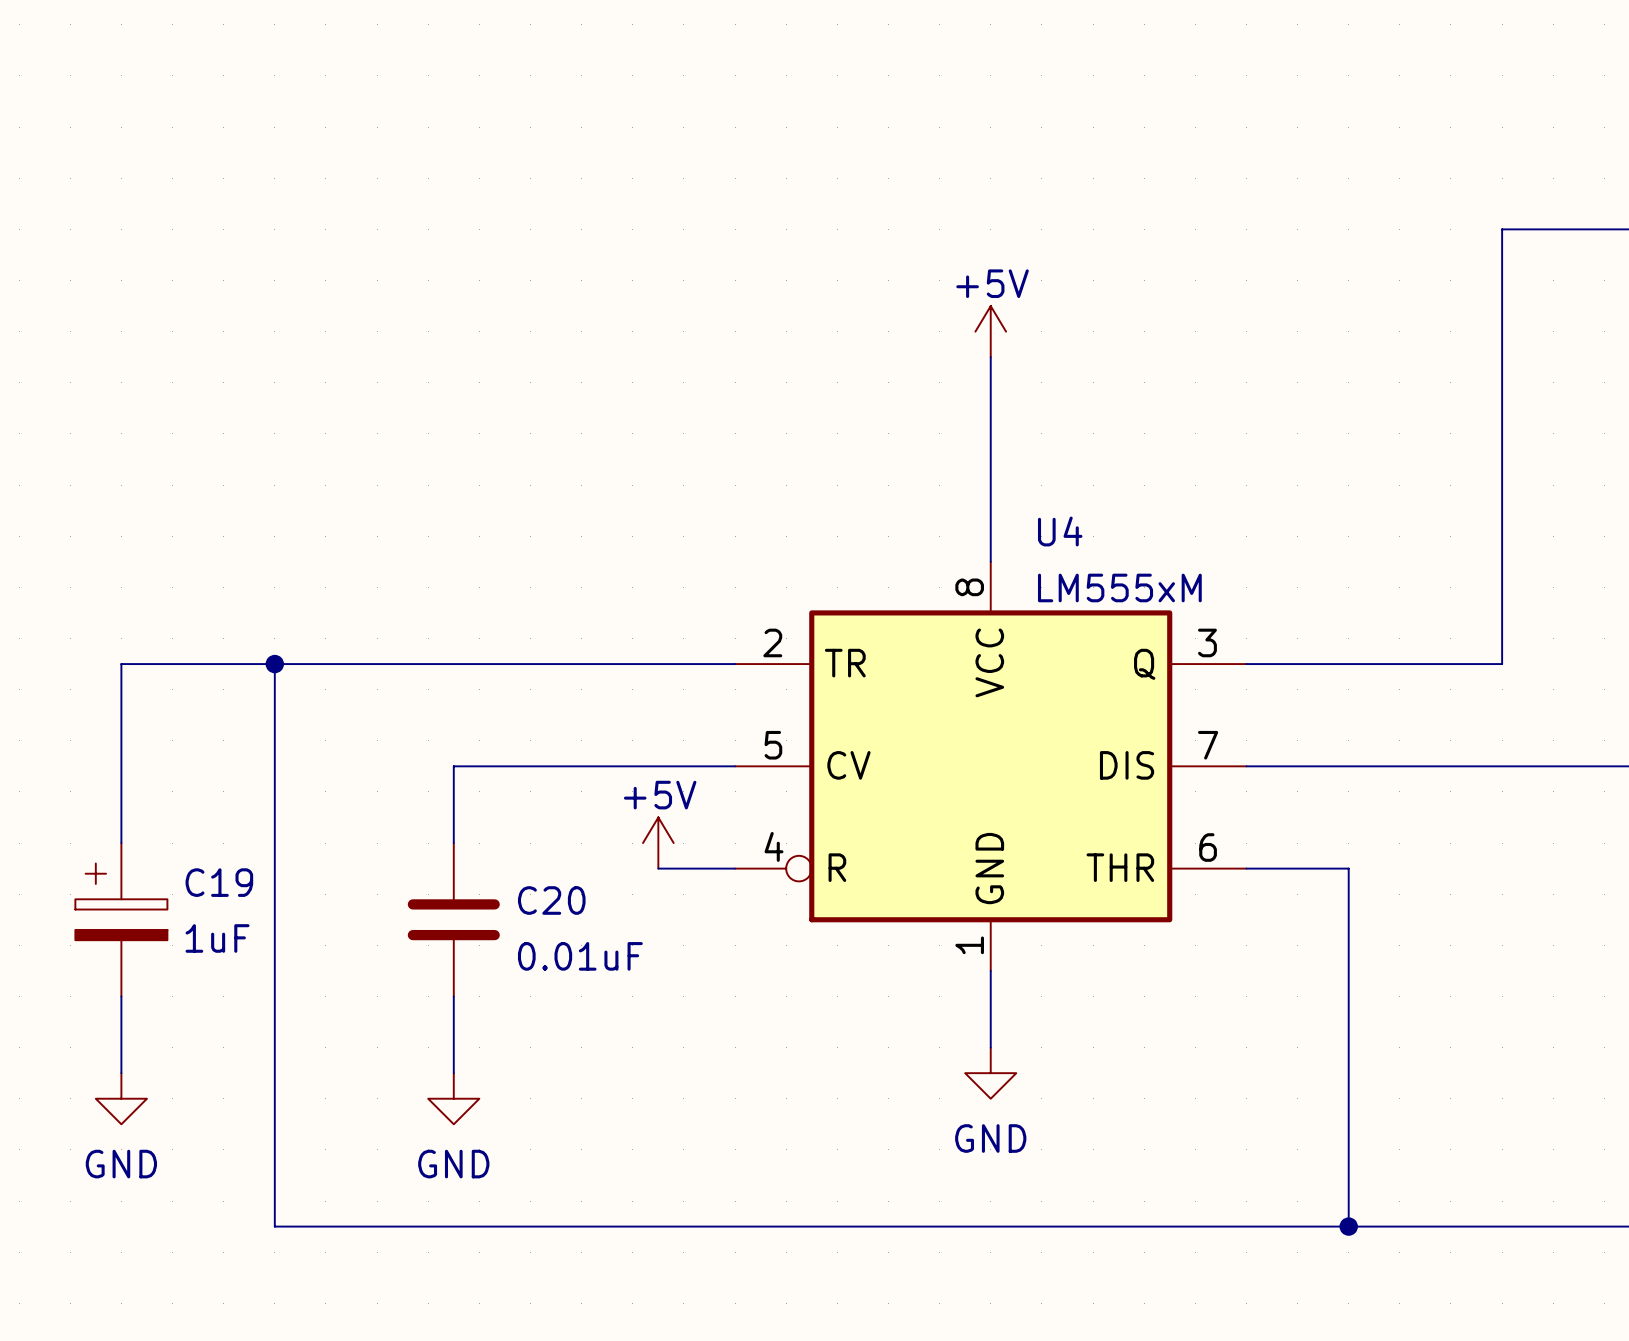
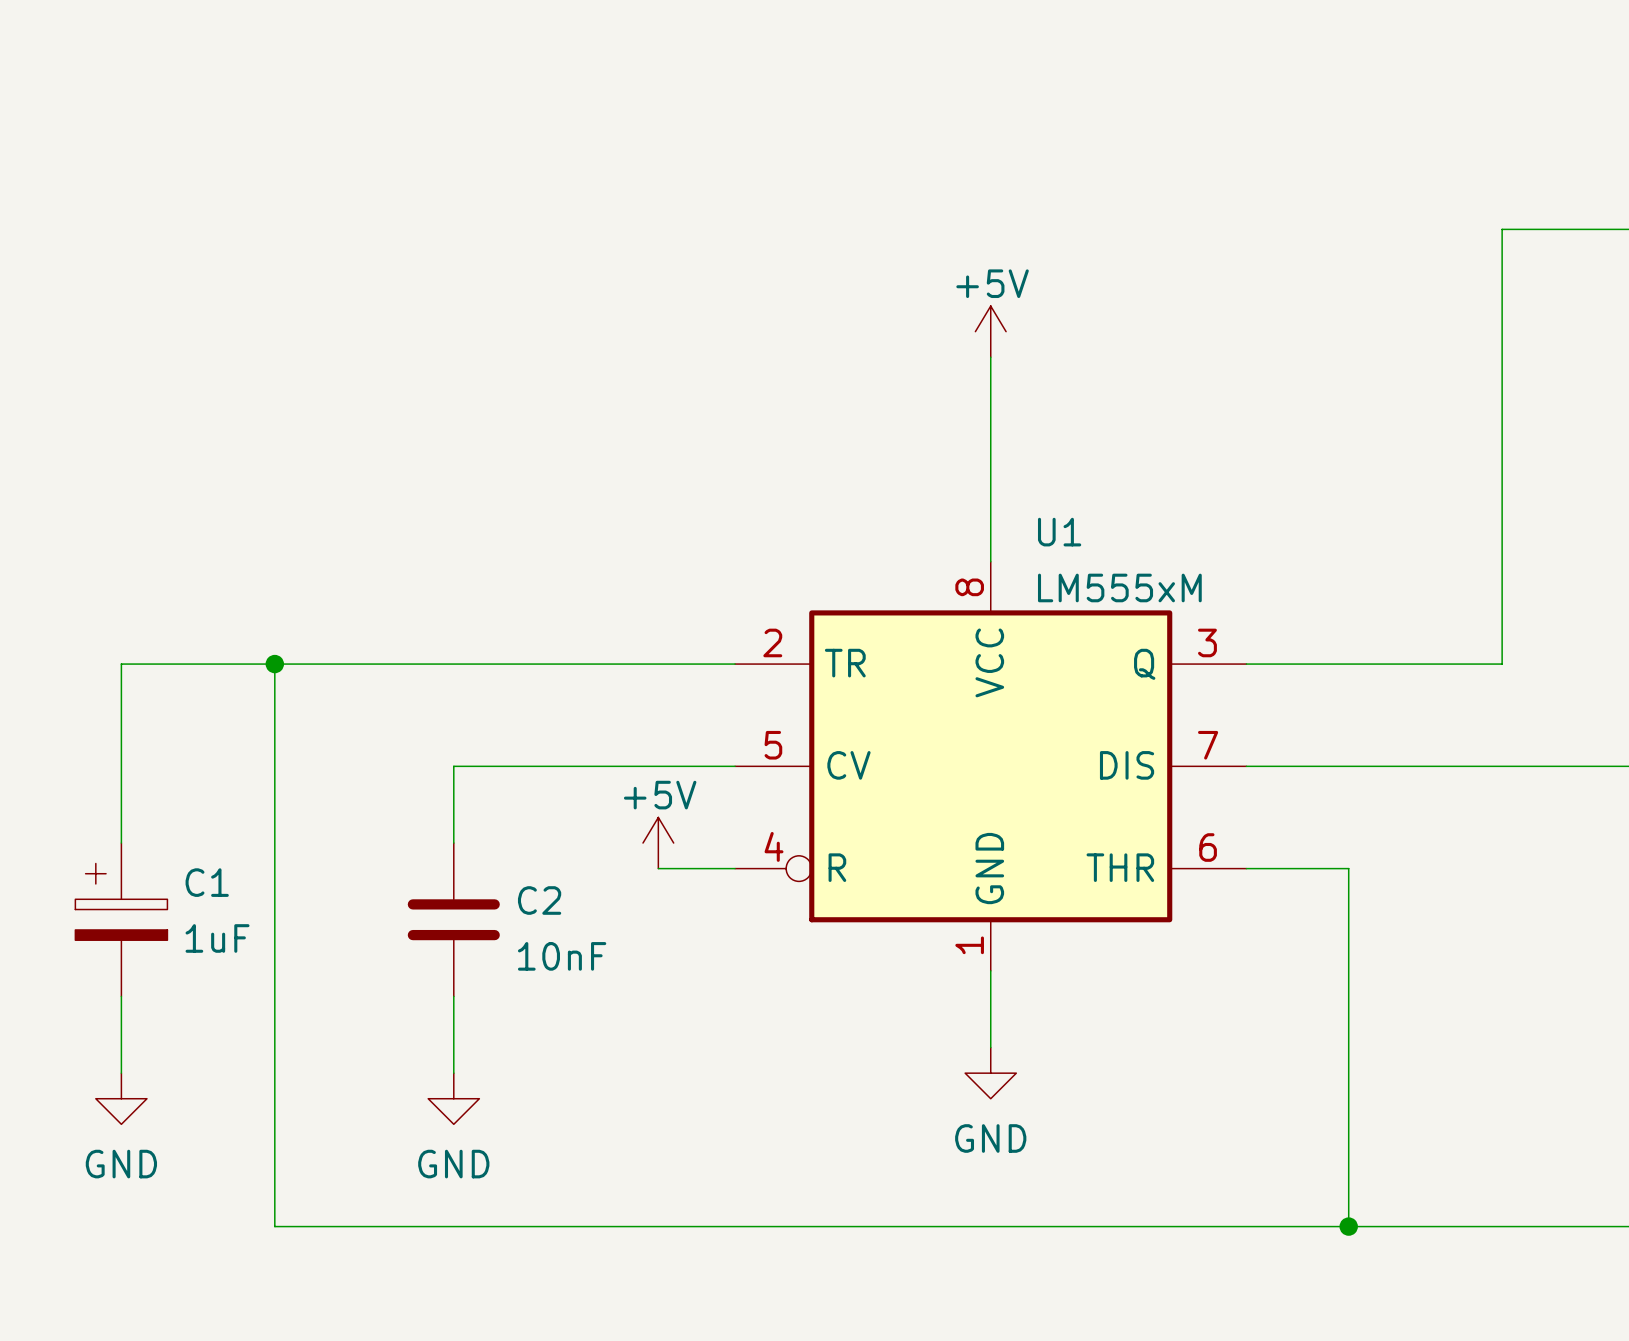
U4 name: U4 (1060, 531) -> U1 (1059, 532)
C19 name: C19 (219, 882) -> C1 (207, 882)
C20 name: C20 (551, 900) -> C2 (539, 900)
C20 value: 0.01uF (580, 956) -> 10nF (562, 956)

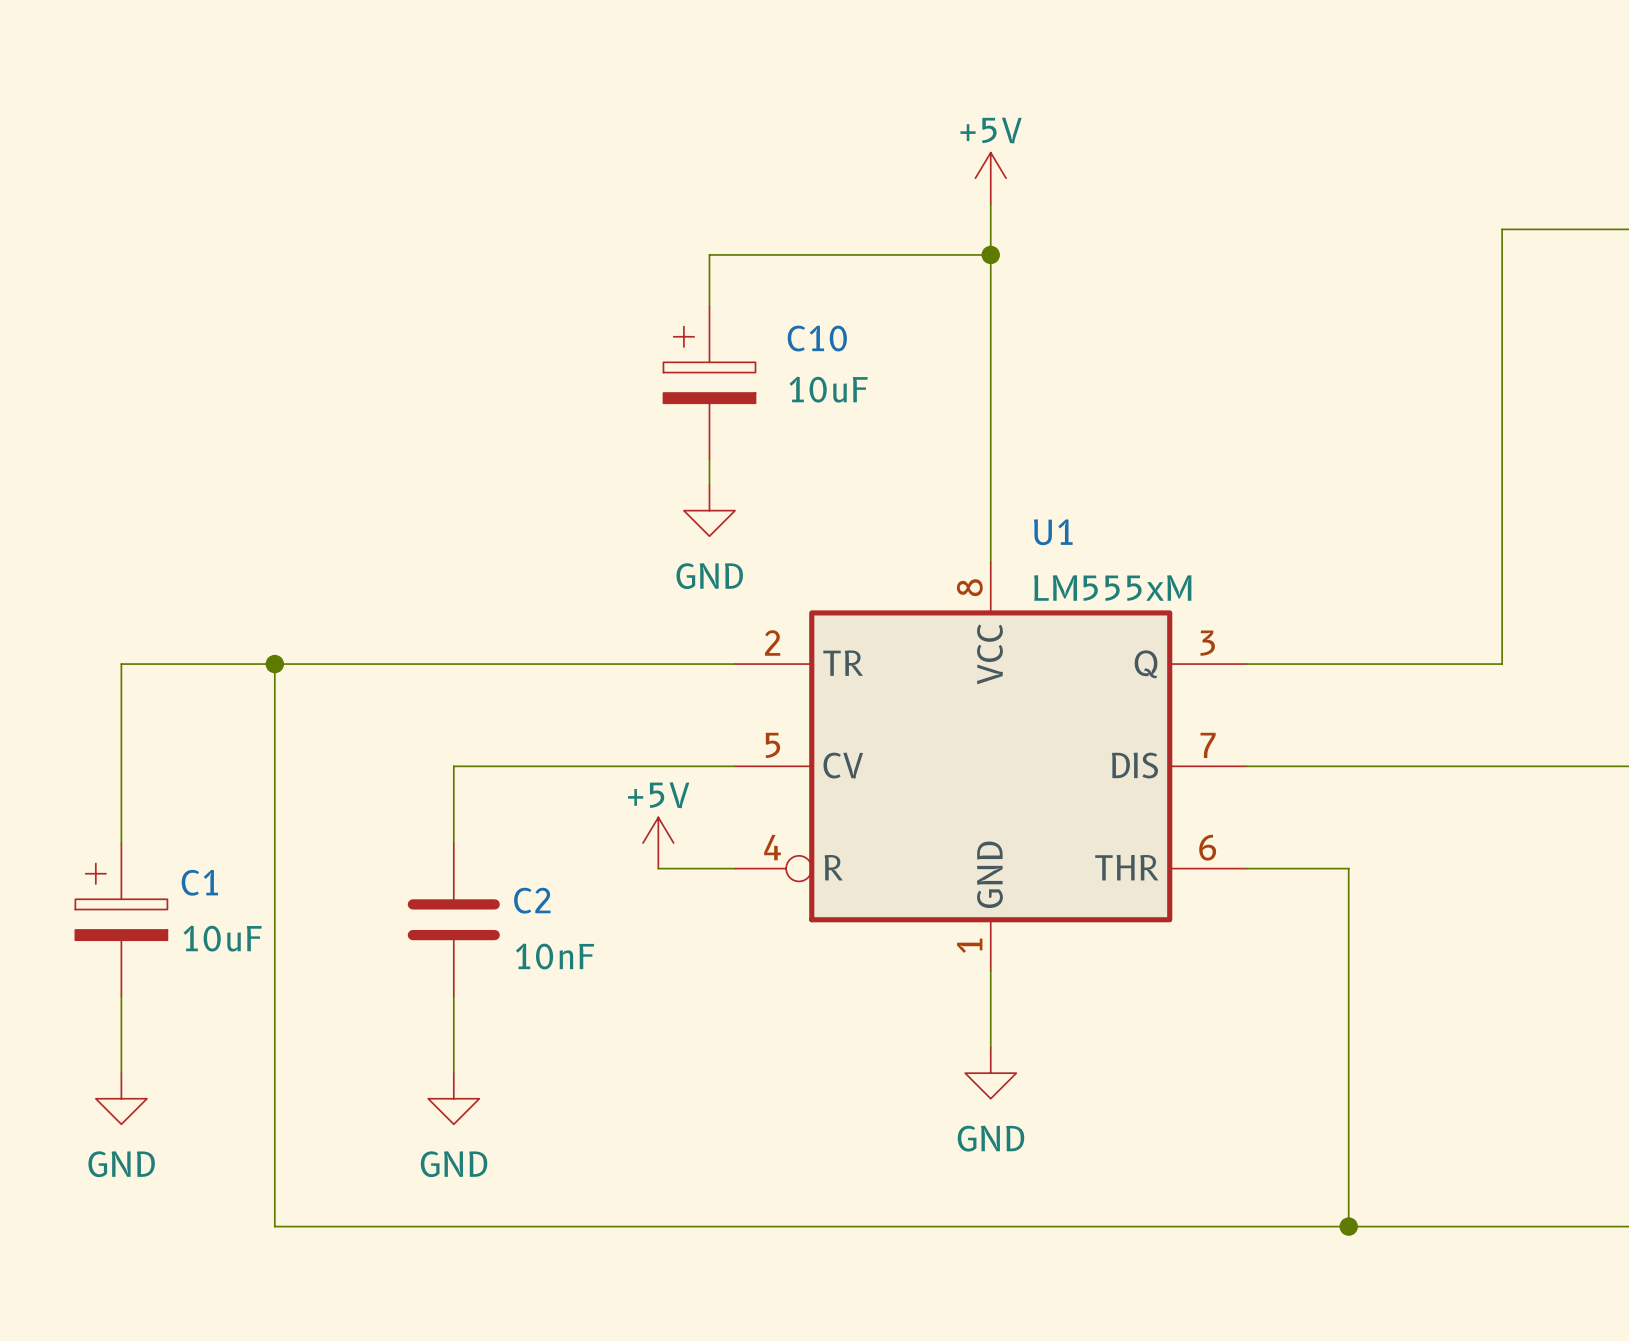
wire: none -> (990, 203) (990, 357)
wire: none -> (990, 254) (709, 254) (709, 306)
junction: none -> (990, 254)
power symbol position: +5V (990, 331) -> +5V (990, 178)
C10: none -> 10uF (709, 382)
wire: none -> (709, 459) (709, 485)
power symbol: none -> GND (709, 510)
C1 value: 1uF (217, 938) -> 10uF (222, 938)

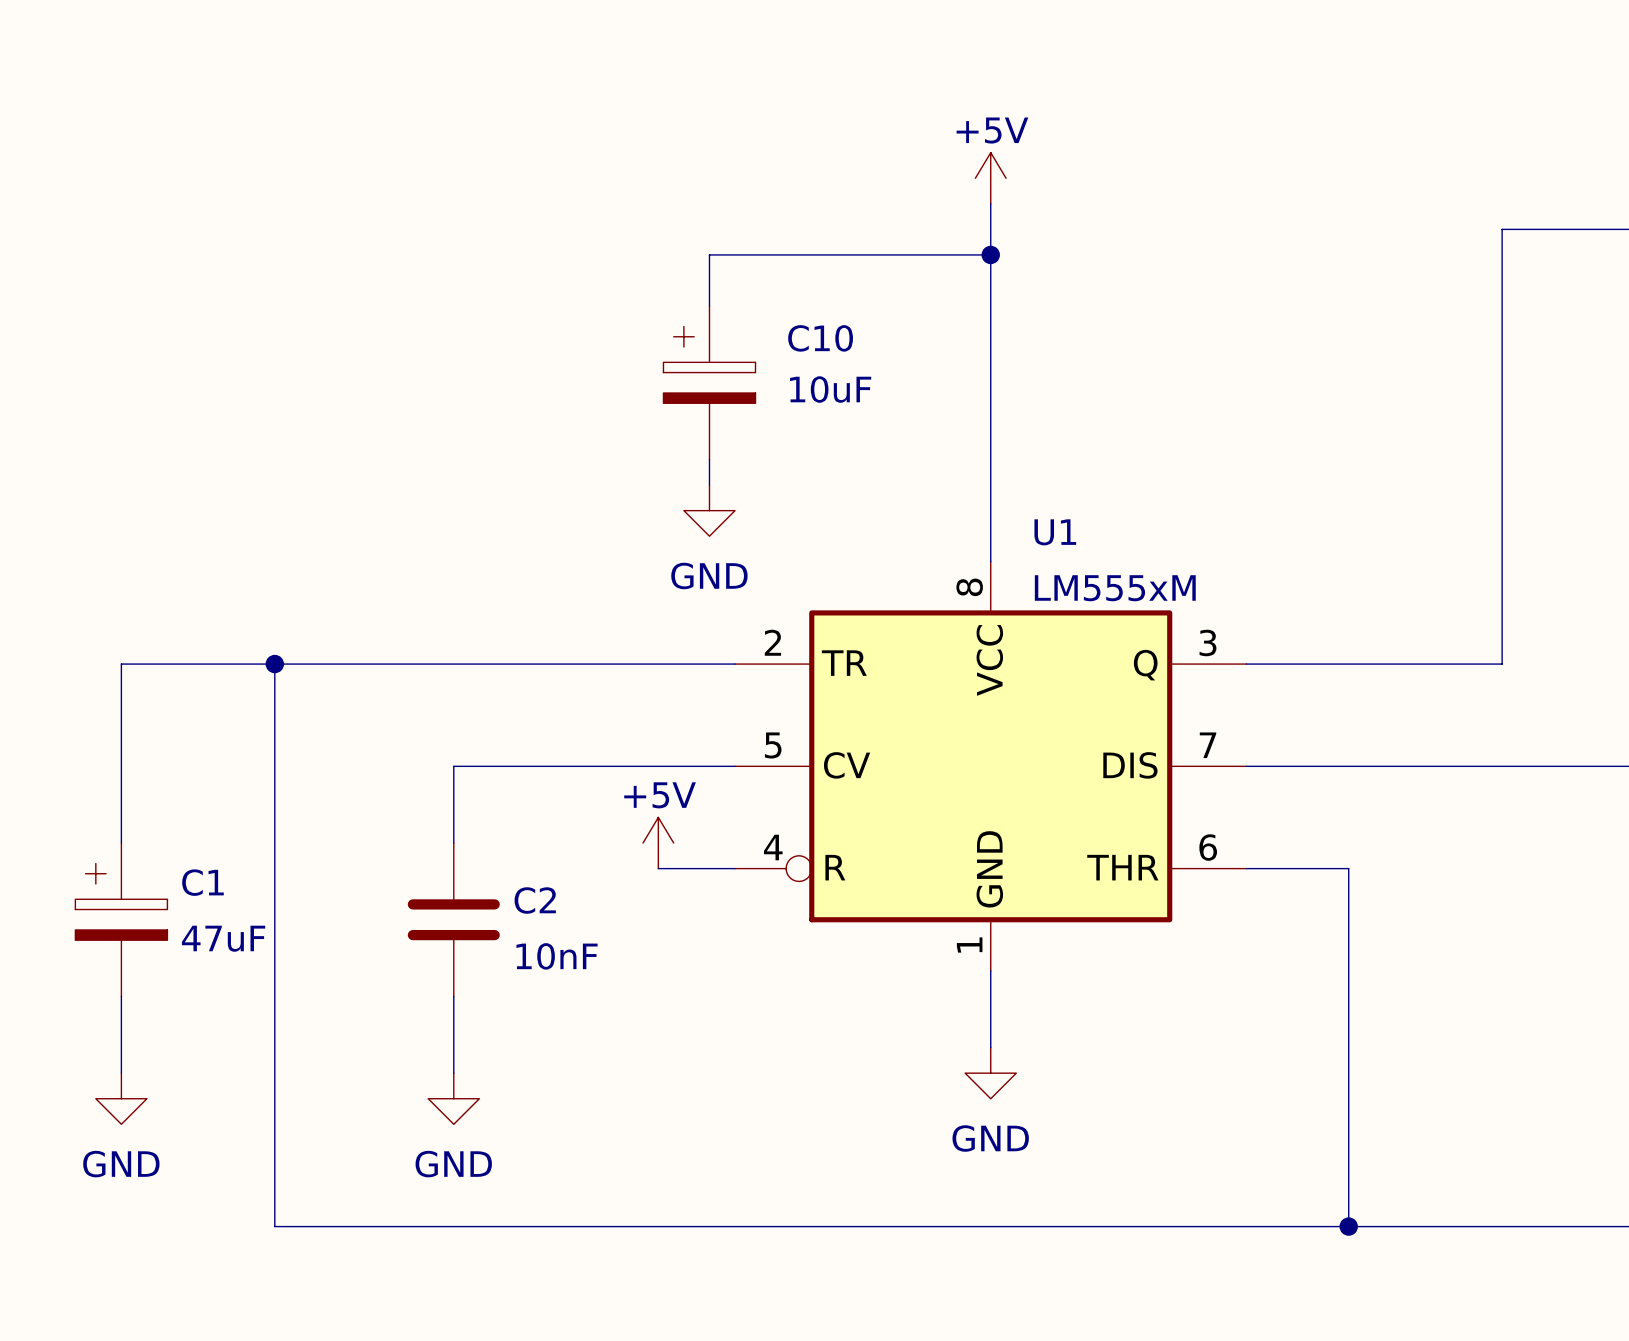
C1 value: 10uF (222, 938) -> 47uF (223, 938)

